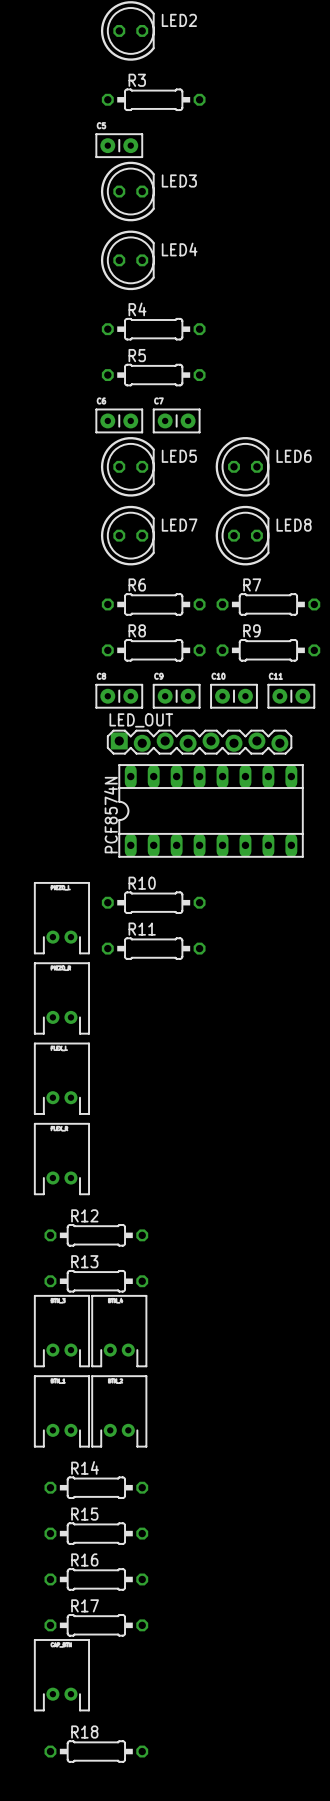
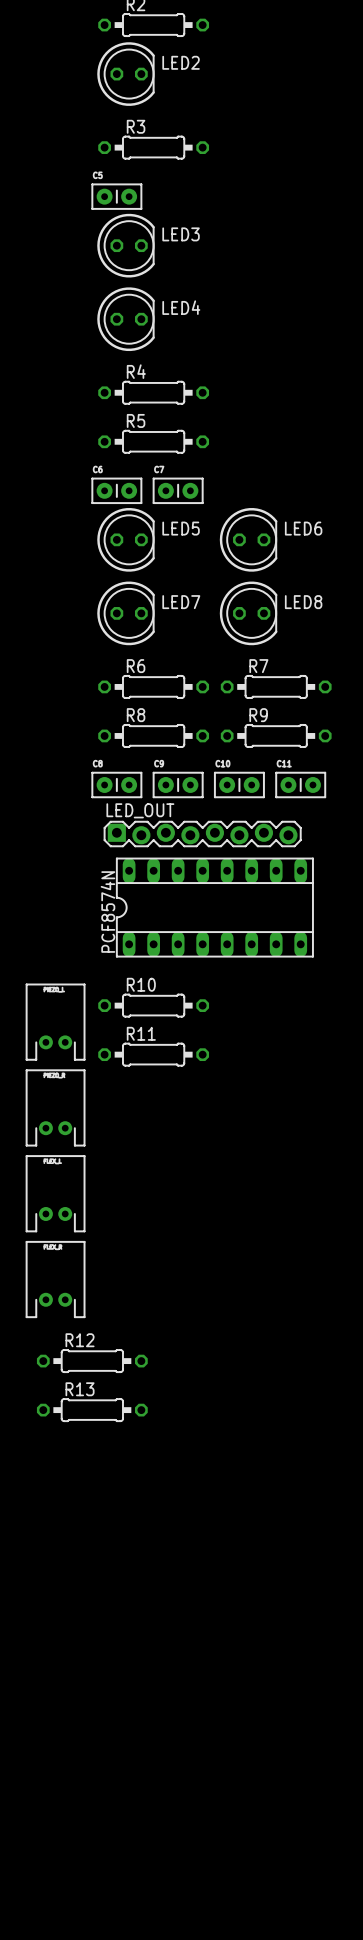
part: (61, 1331) -> none
part: (119, 1331) -> none
part: (61, 1411) -> none
part: (119, 1411) -> none
R14: (96, 1487) -> none
R15: (96, 1533) -> none
R16: (96, 1579) -> none
R17: (96, 1625) -> none
part: (61, 1675) -> none
R18: (96, 1751) -> none

